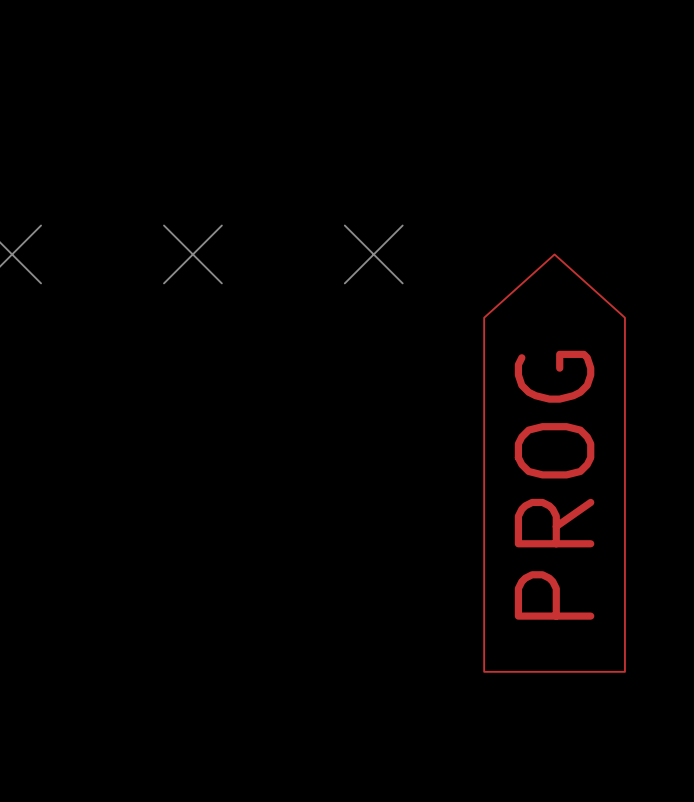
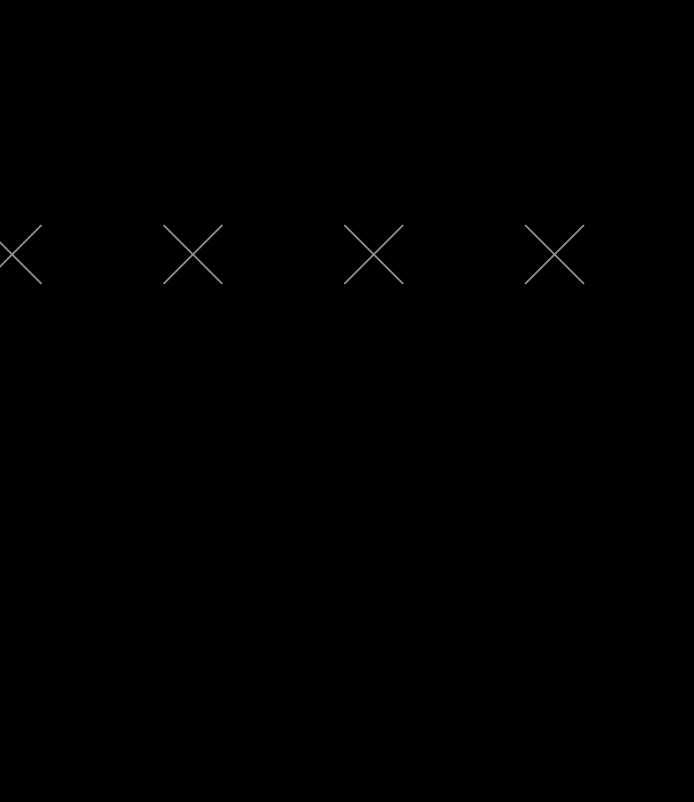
no-connect mark: none -> (554, 254)
global label: PROG (554, 485) -> none

